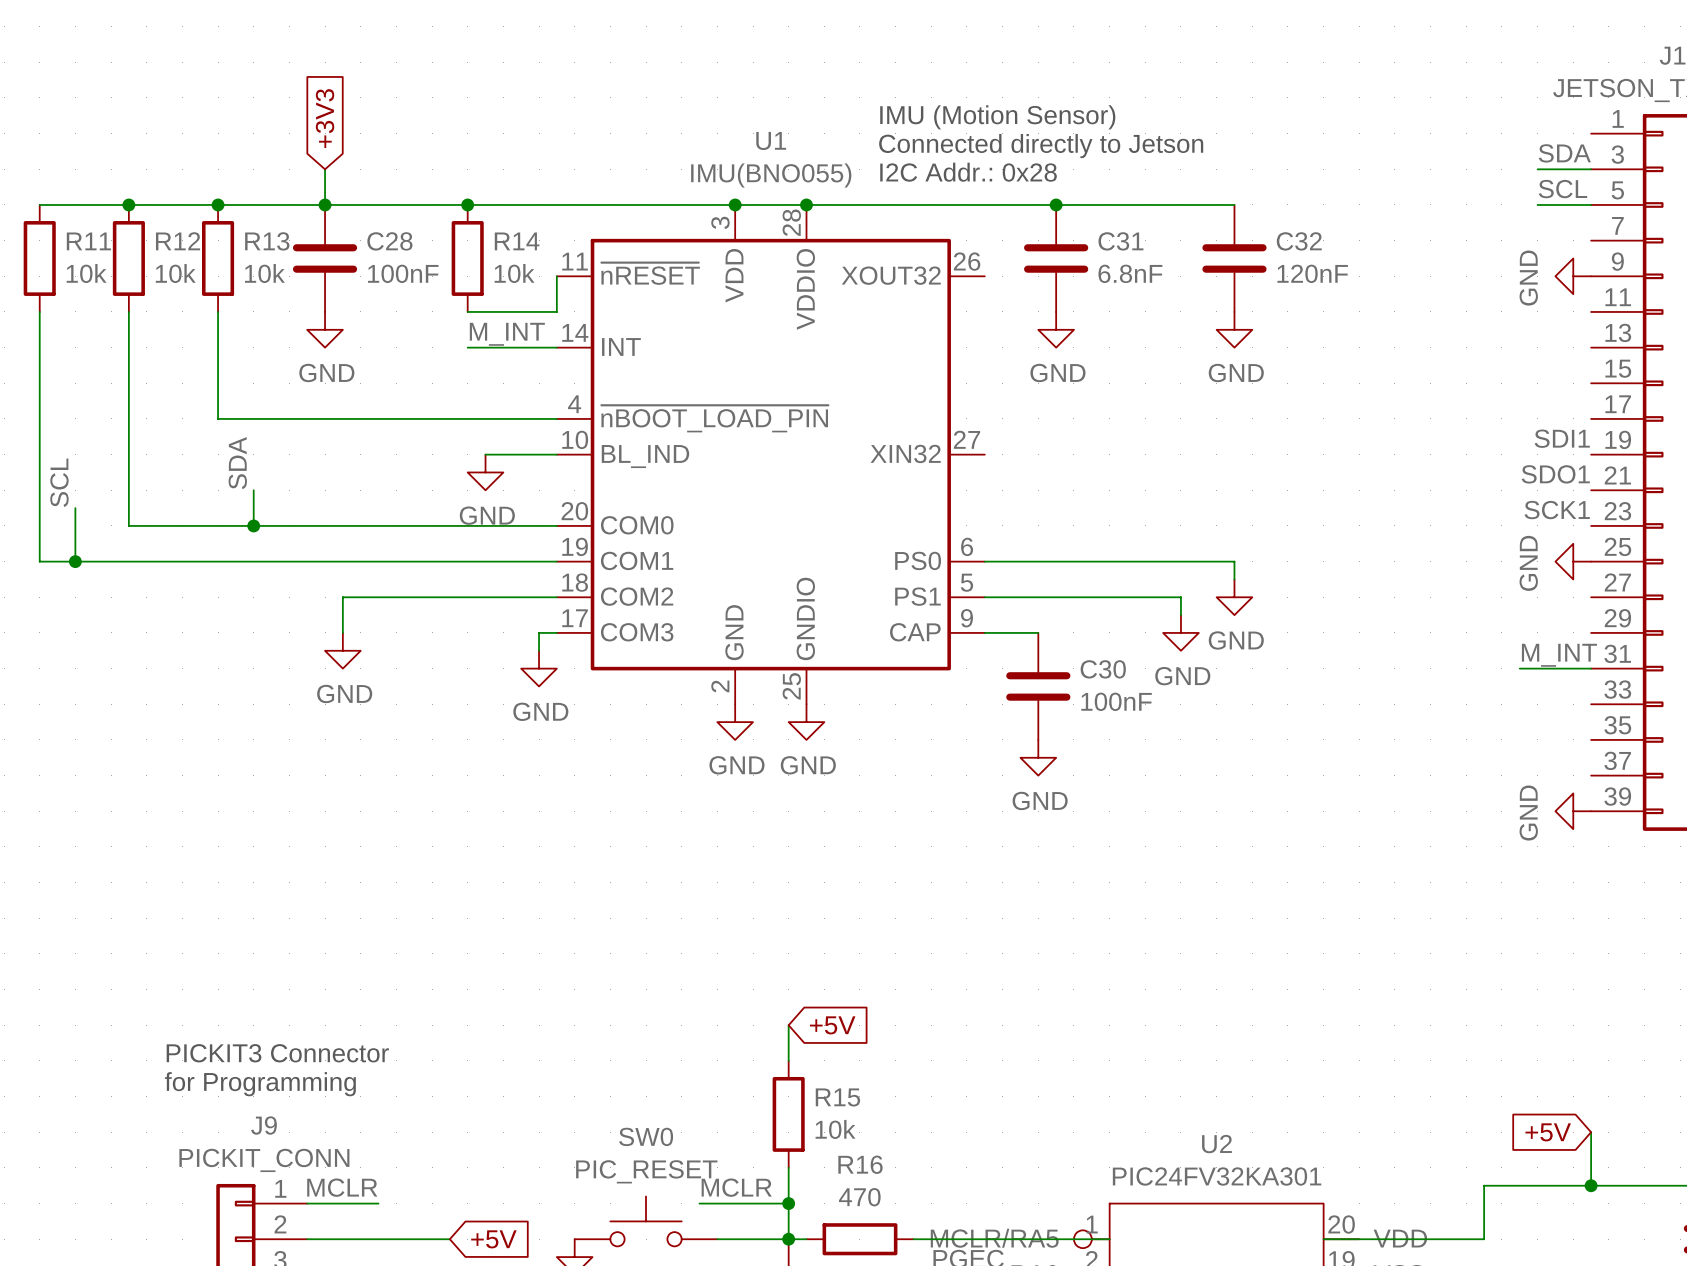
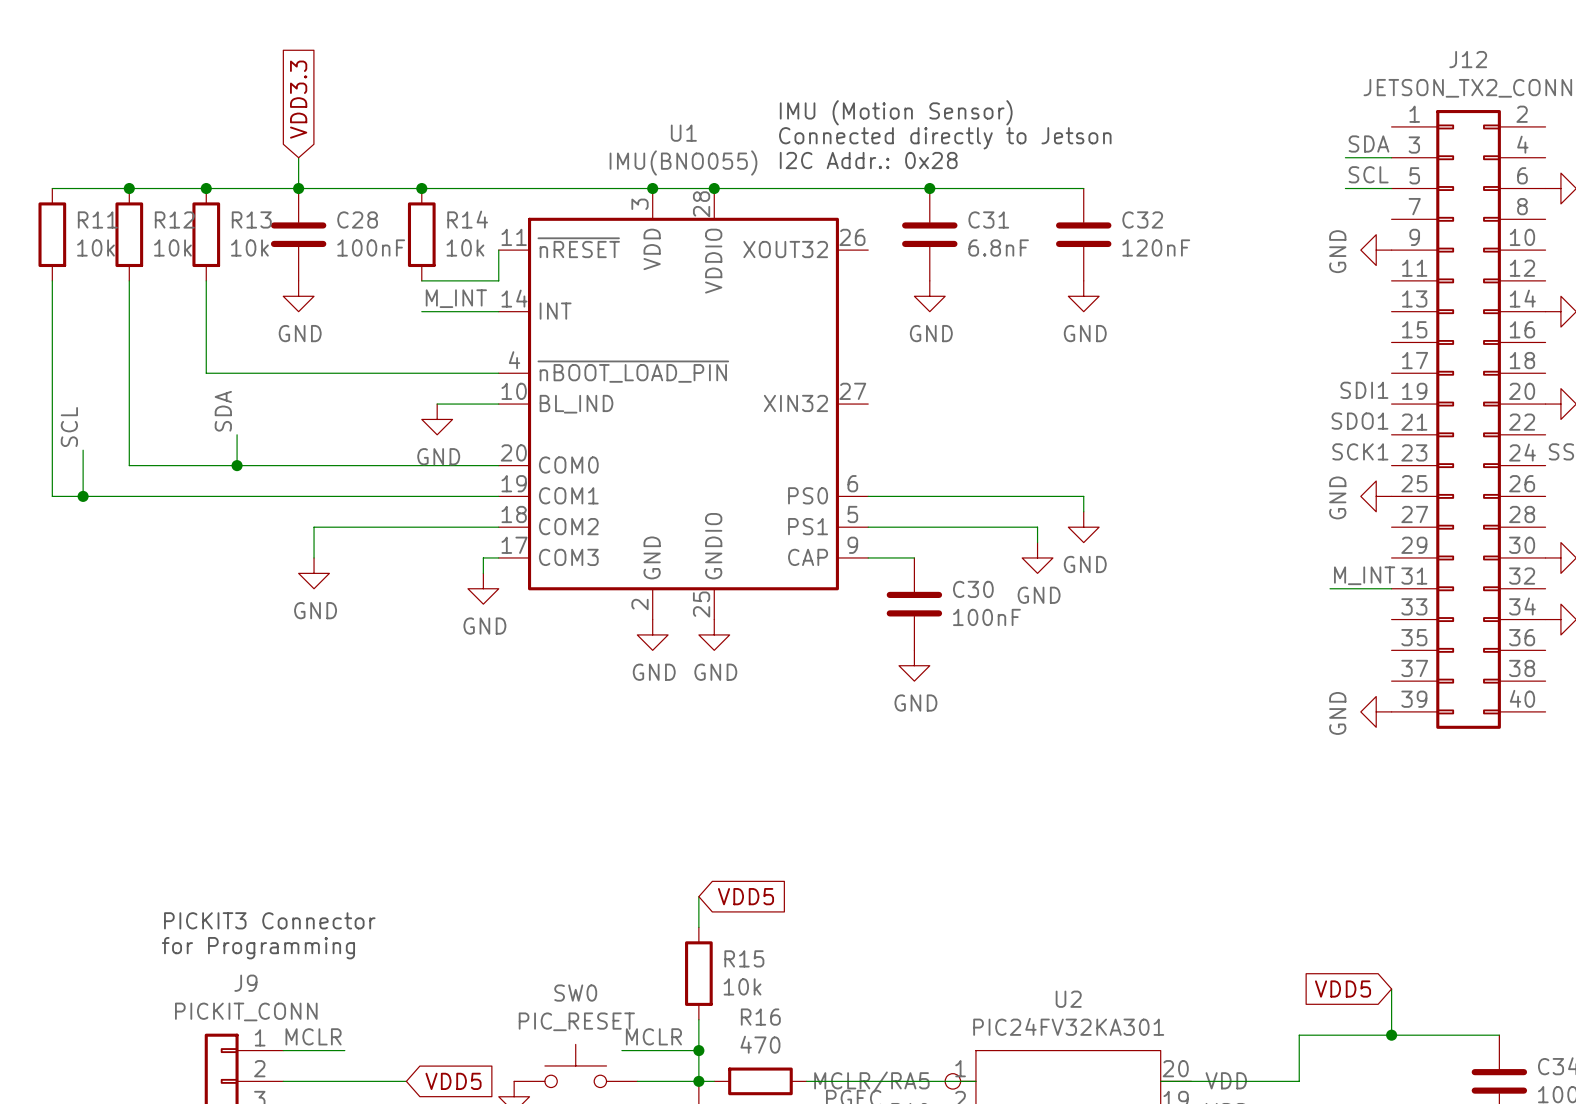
global label: +3V3 (325, 118) -> VDD3.3 (298, 99)
global label: +5V (832, 1025) -> VDD5 (746, 896)
global label: +5V (1548, 1132) -> VDD5 (1343, 989)
global label: +5V (493, 1239) -> VDD5 (453, 1081)

